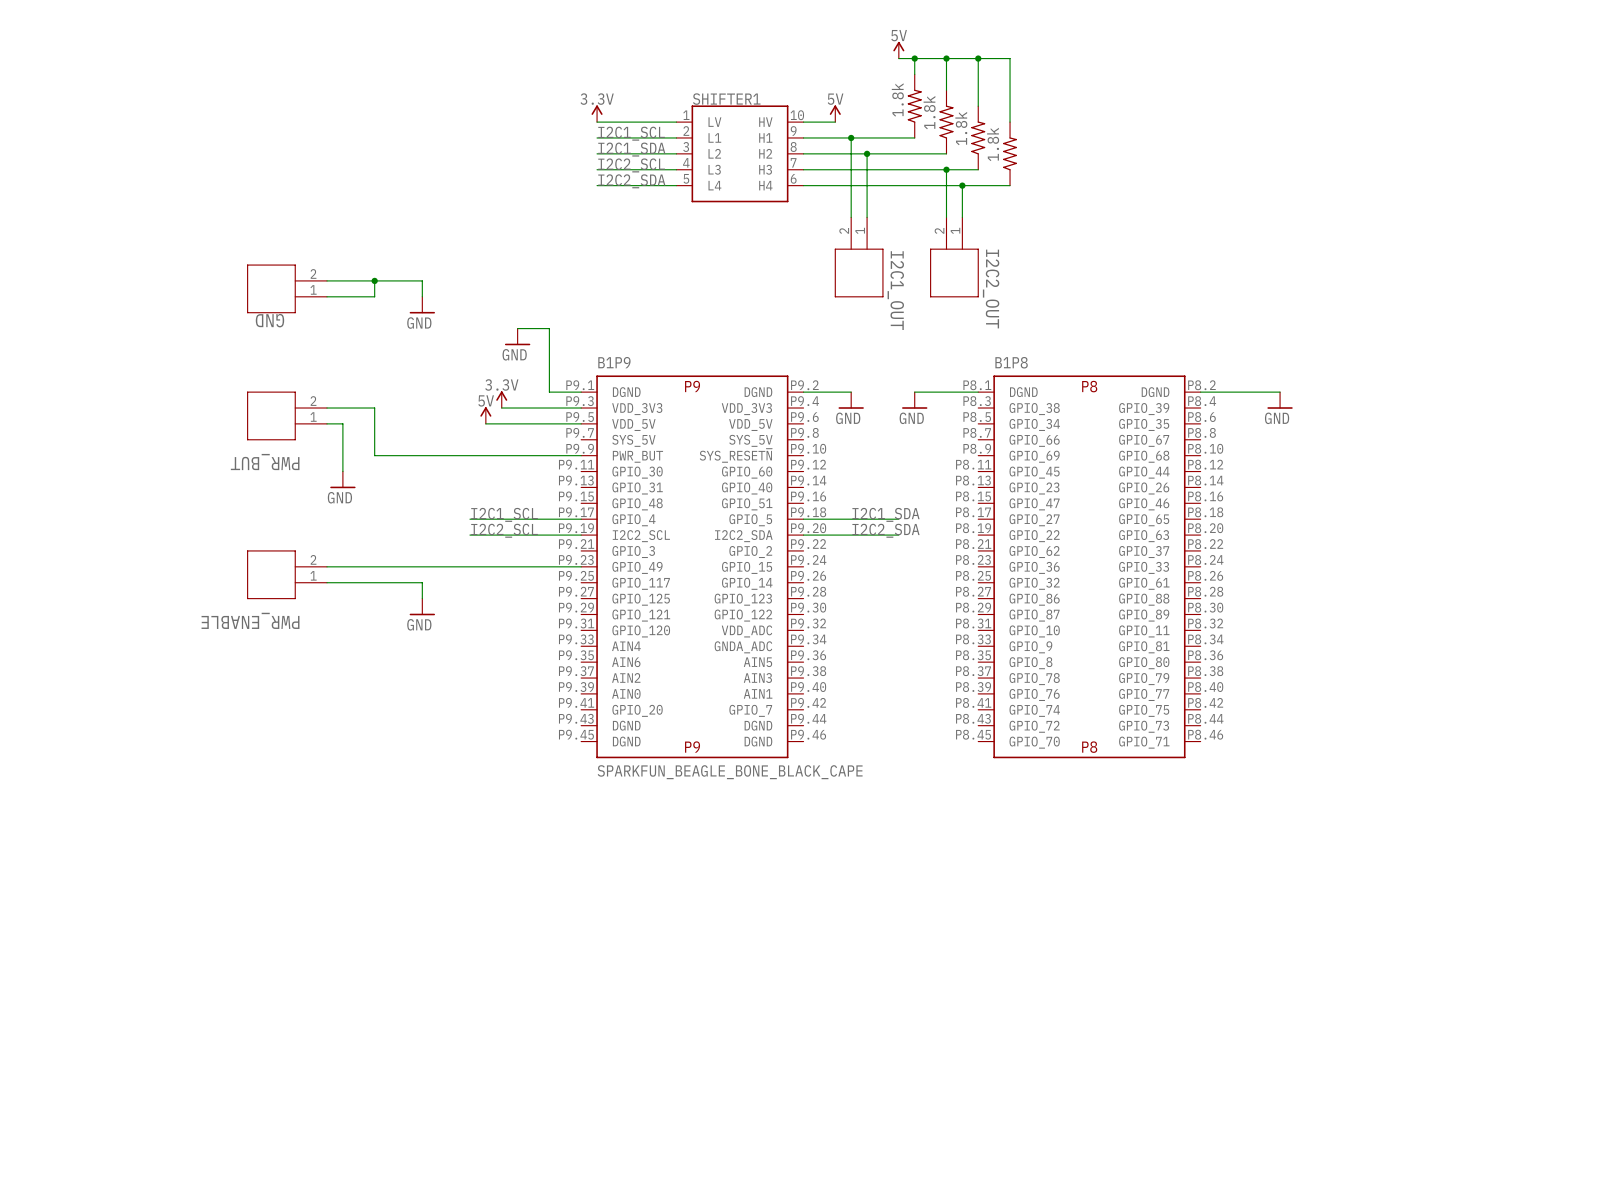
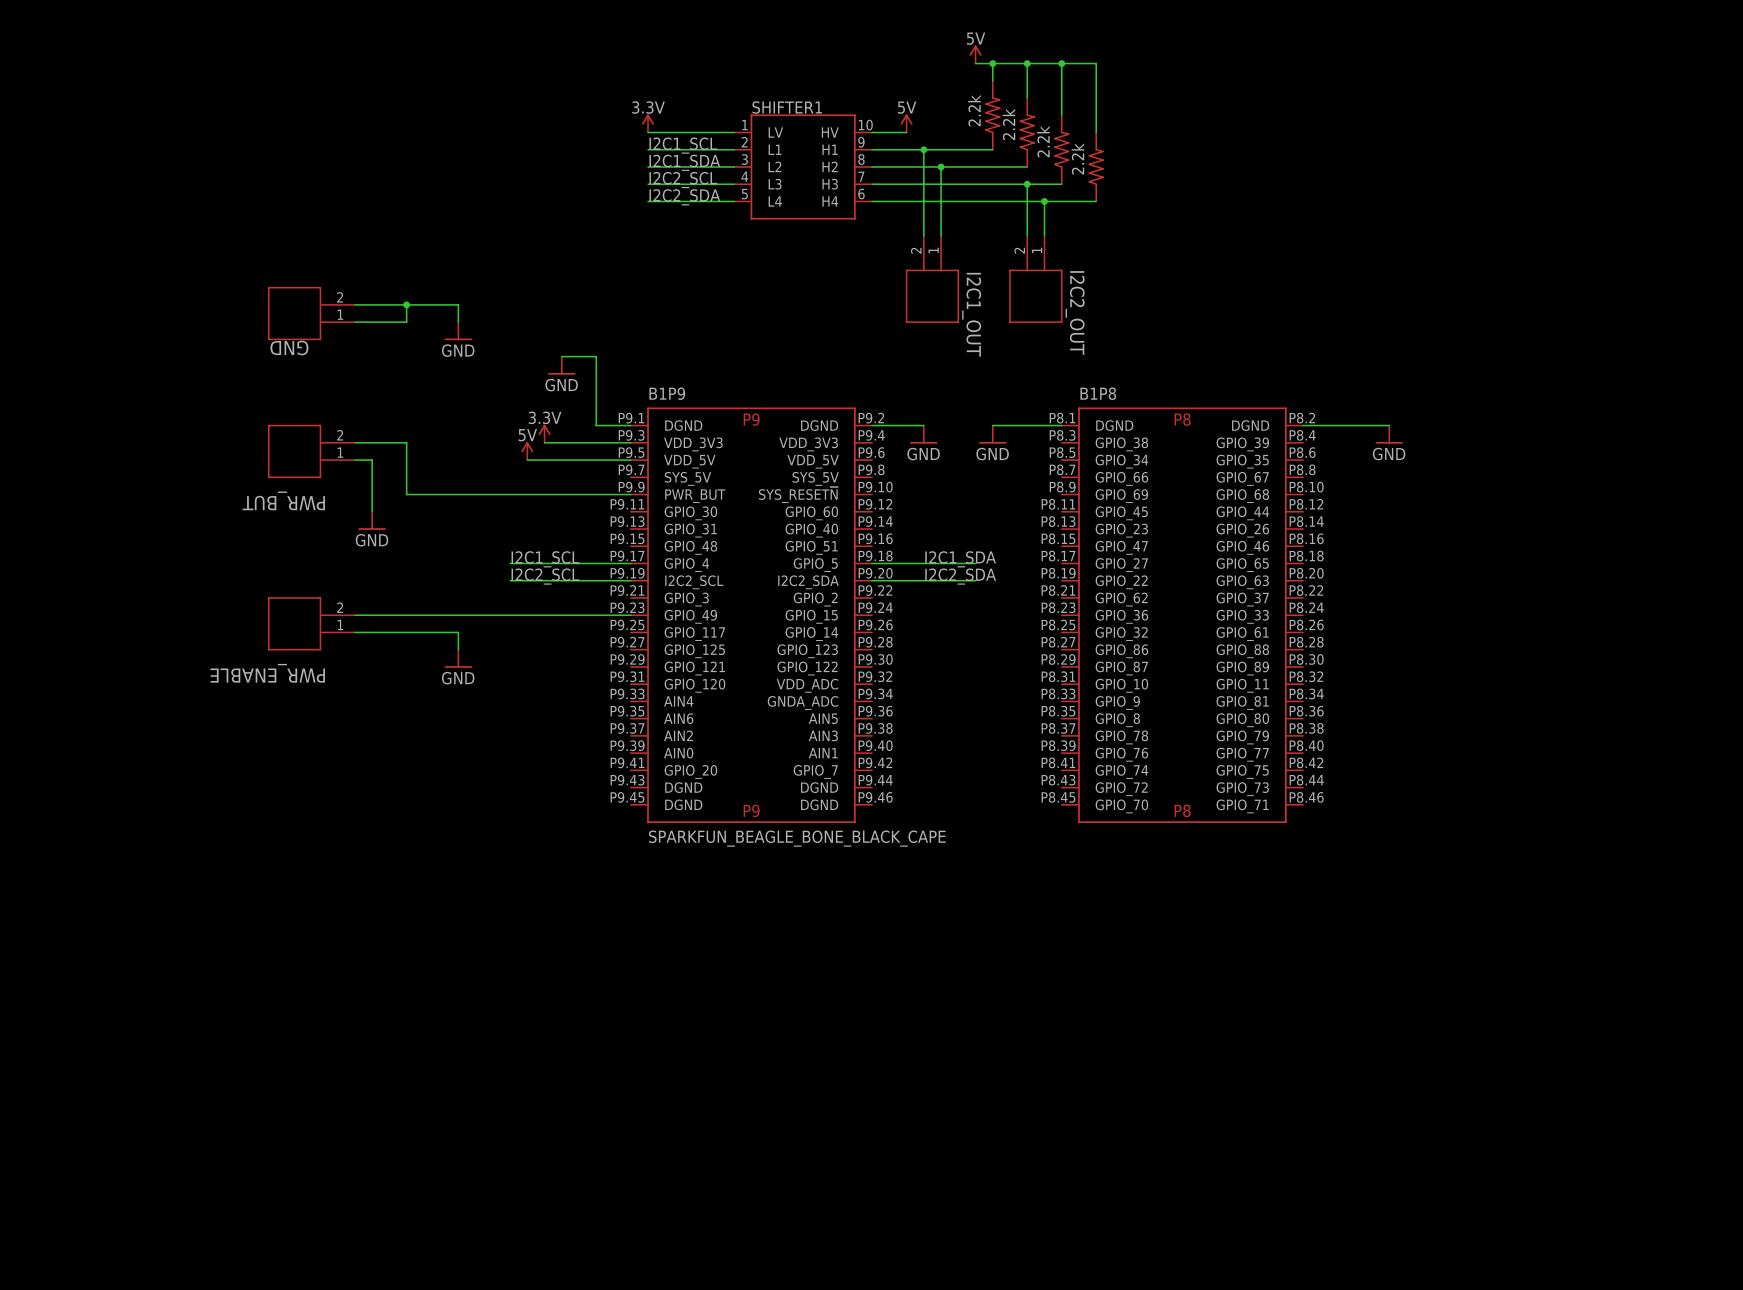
part value: 1.8k (897, 99) -> 2.2k (974, 110)
part value: 1.8k (929, 112) -> 2.2k (1008, 124)
part value: 1.8k (961, 128) -> 2.2k (1043, 141)
part value: 1.8k (993, 144) -> 2.2k (1077, 158)

